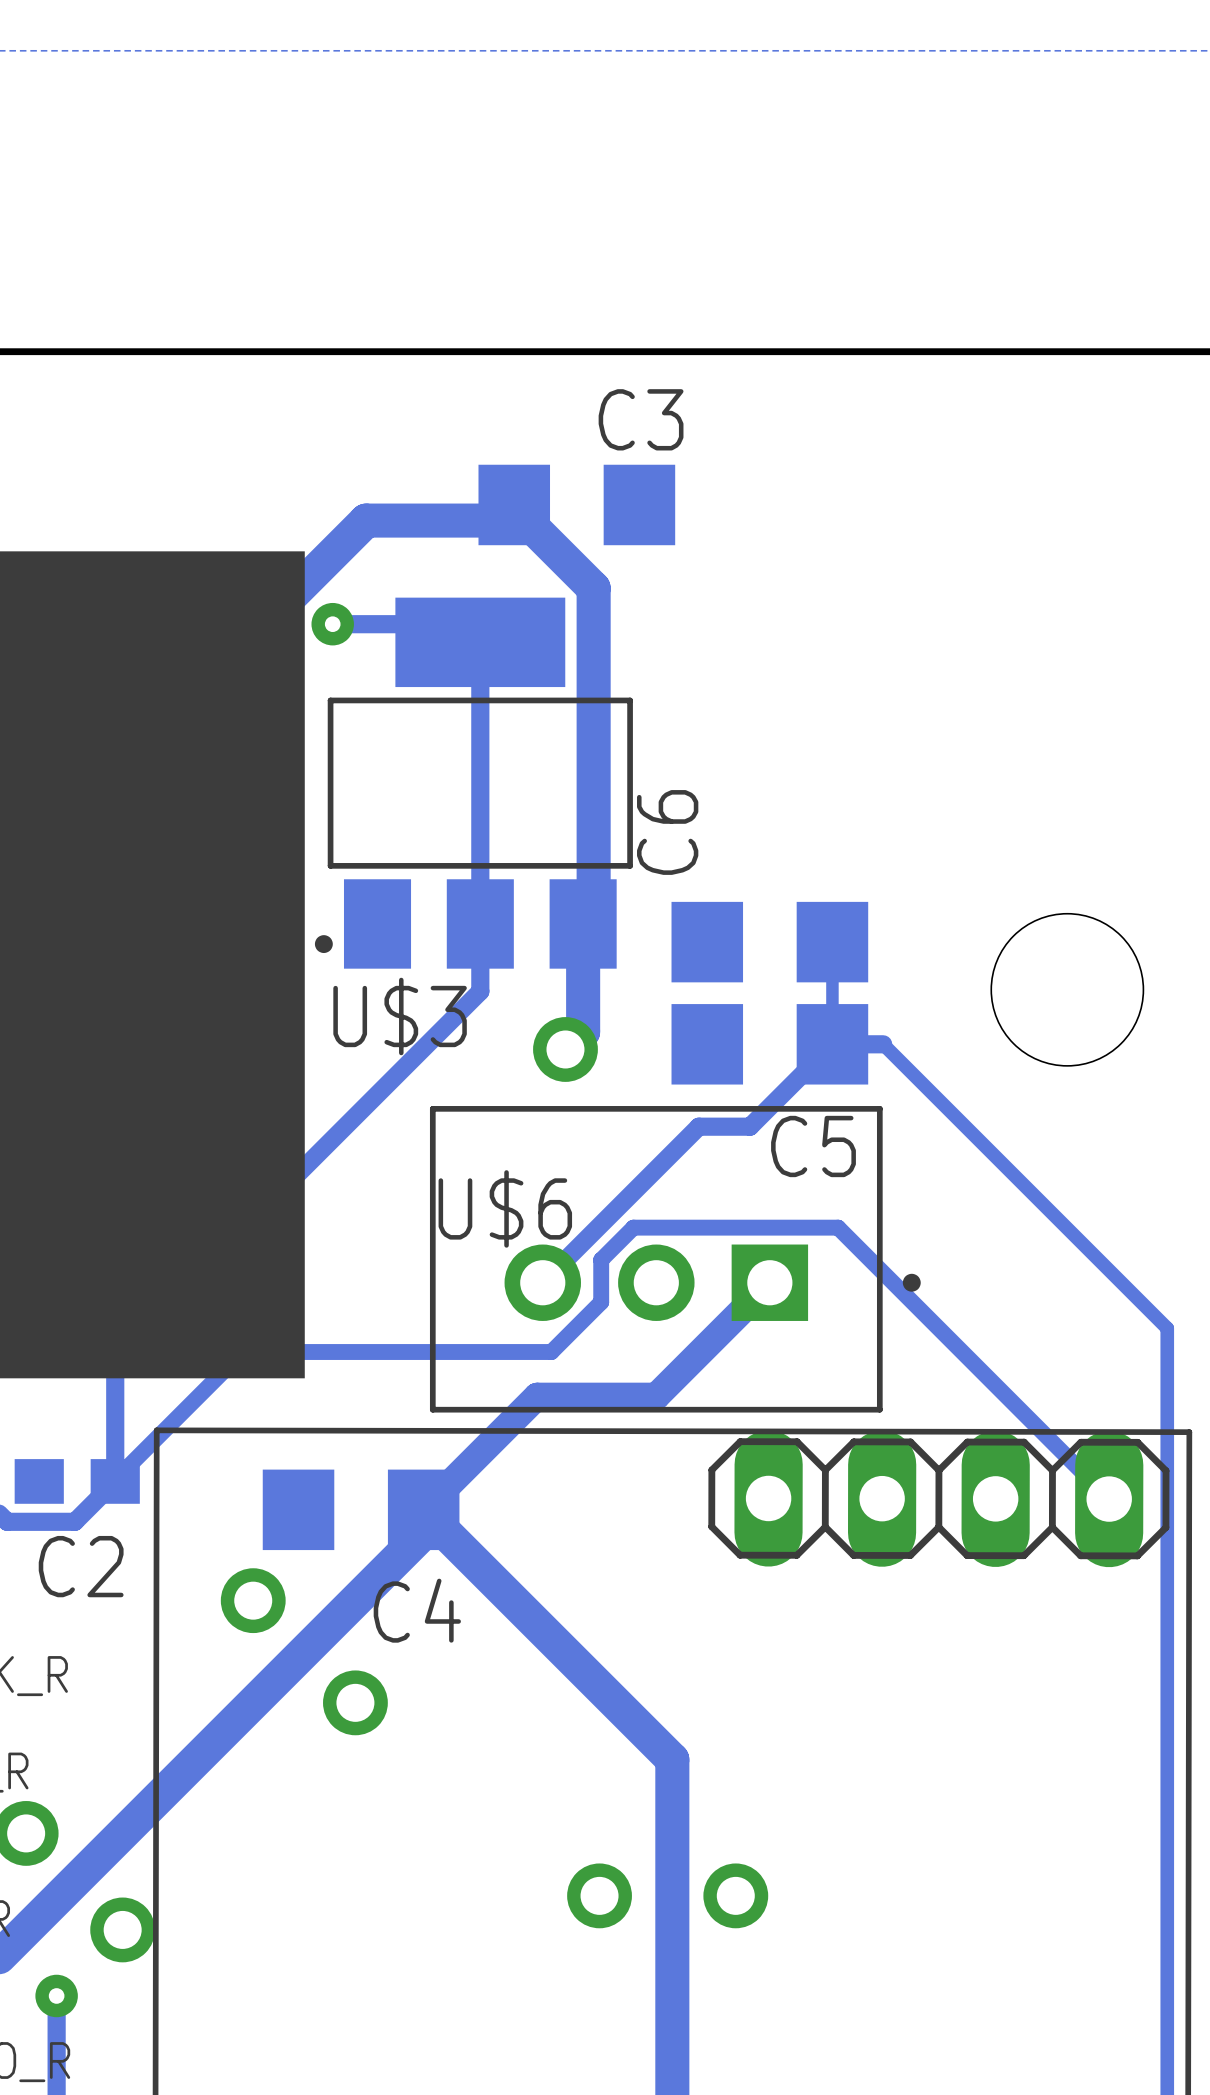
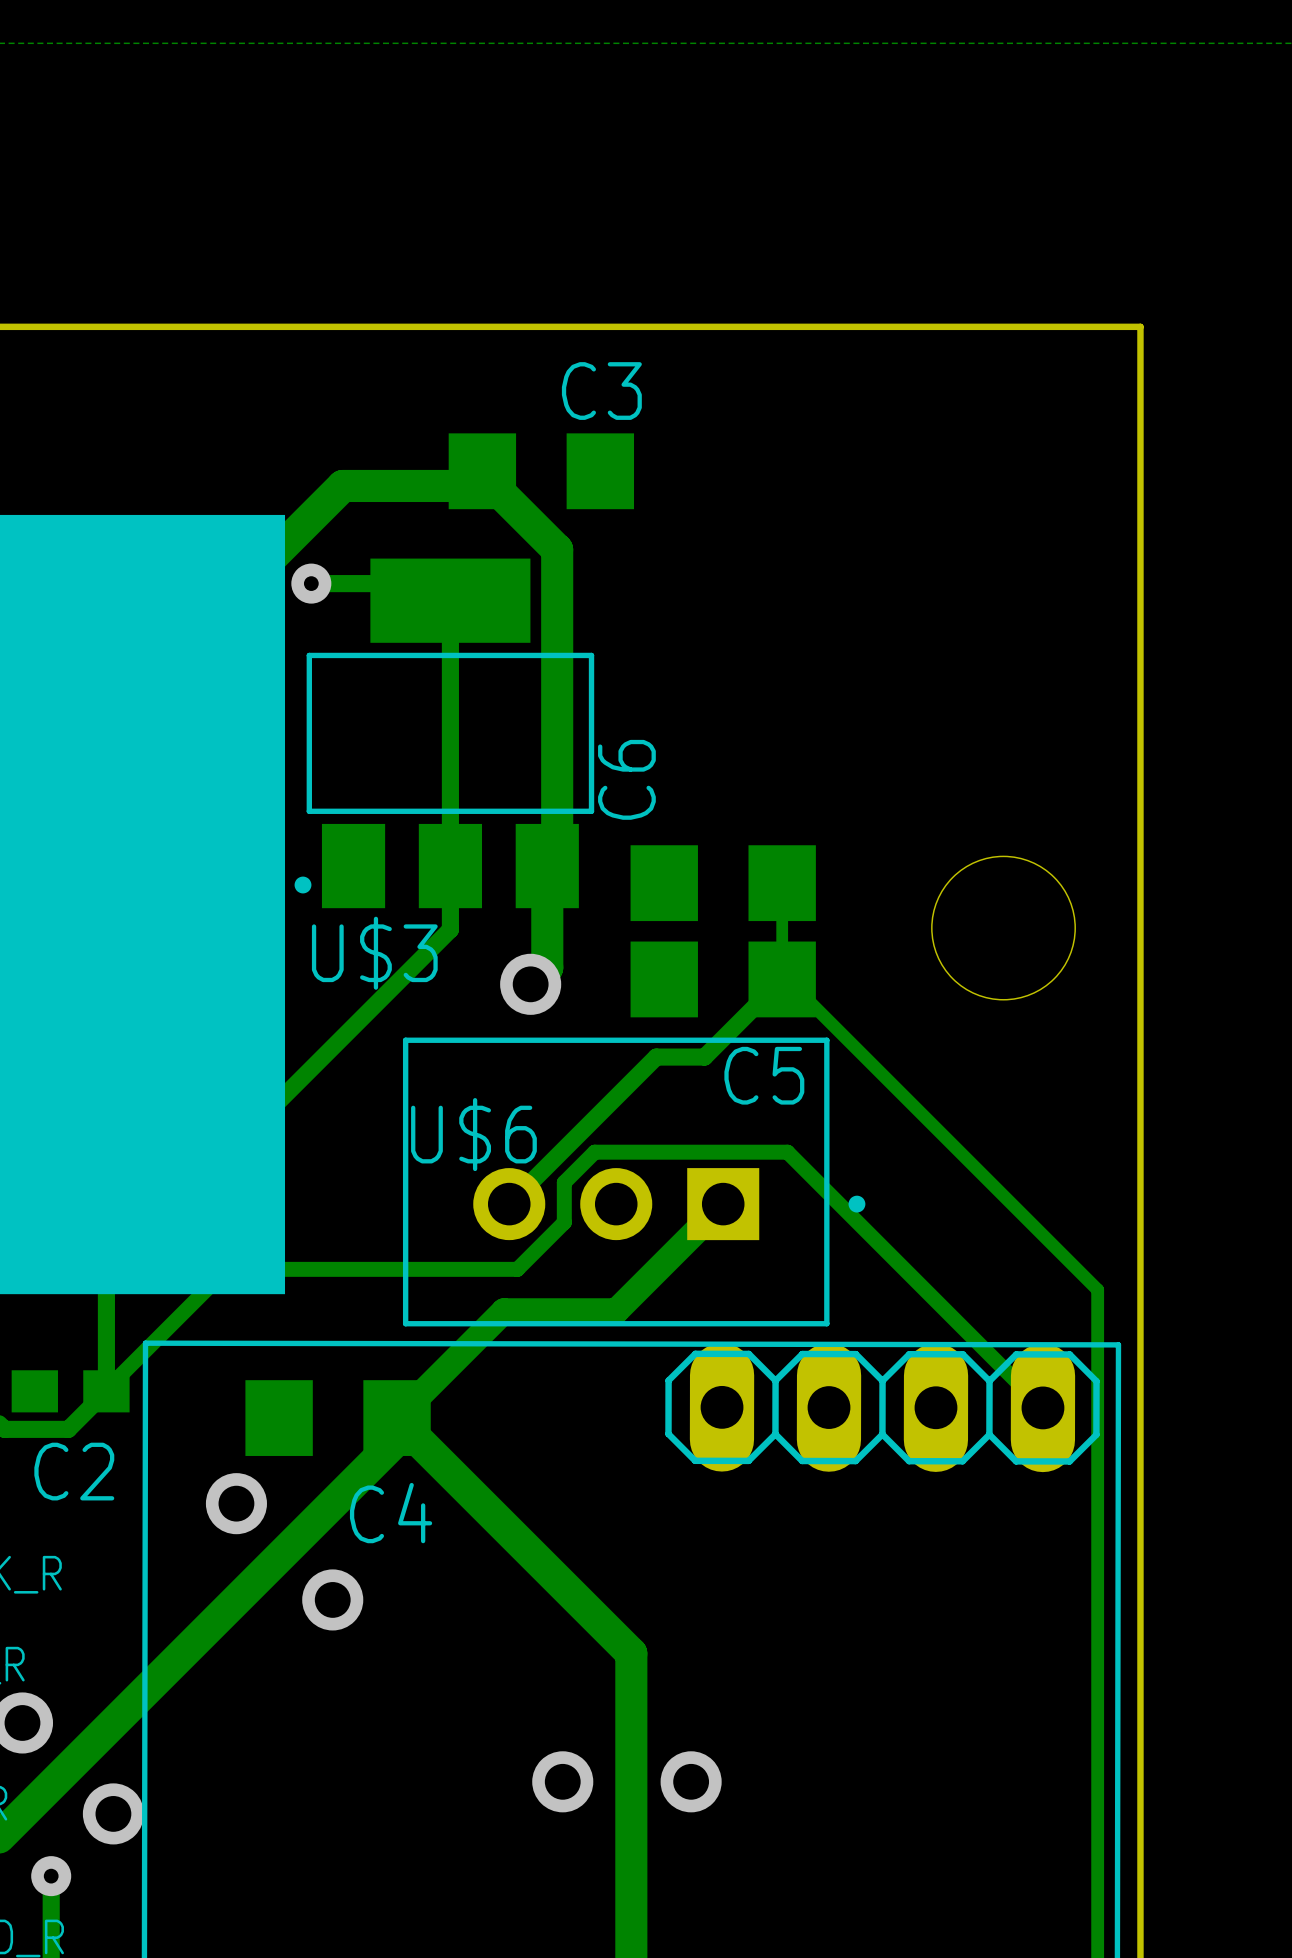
track: (837, 1044) (883, 1044) (1167, 1328) (1167, 1373) -> (787, 979) (1097, 1289)

